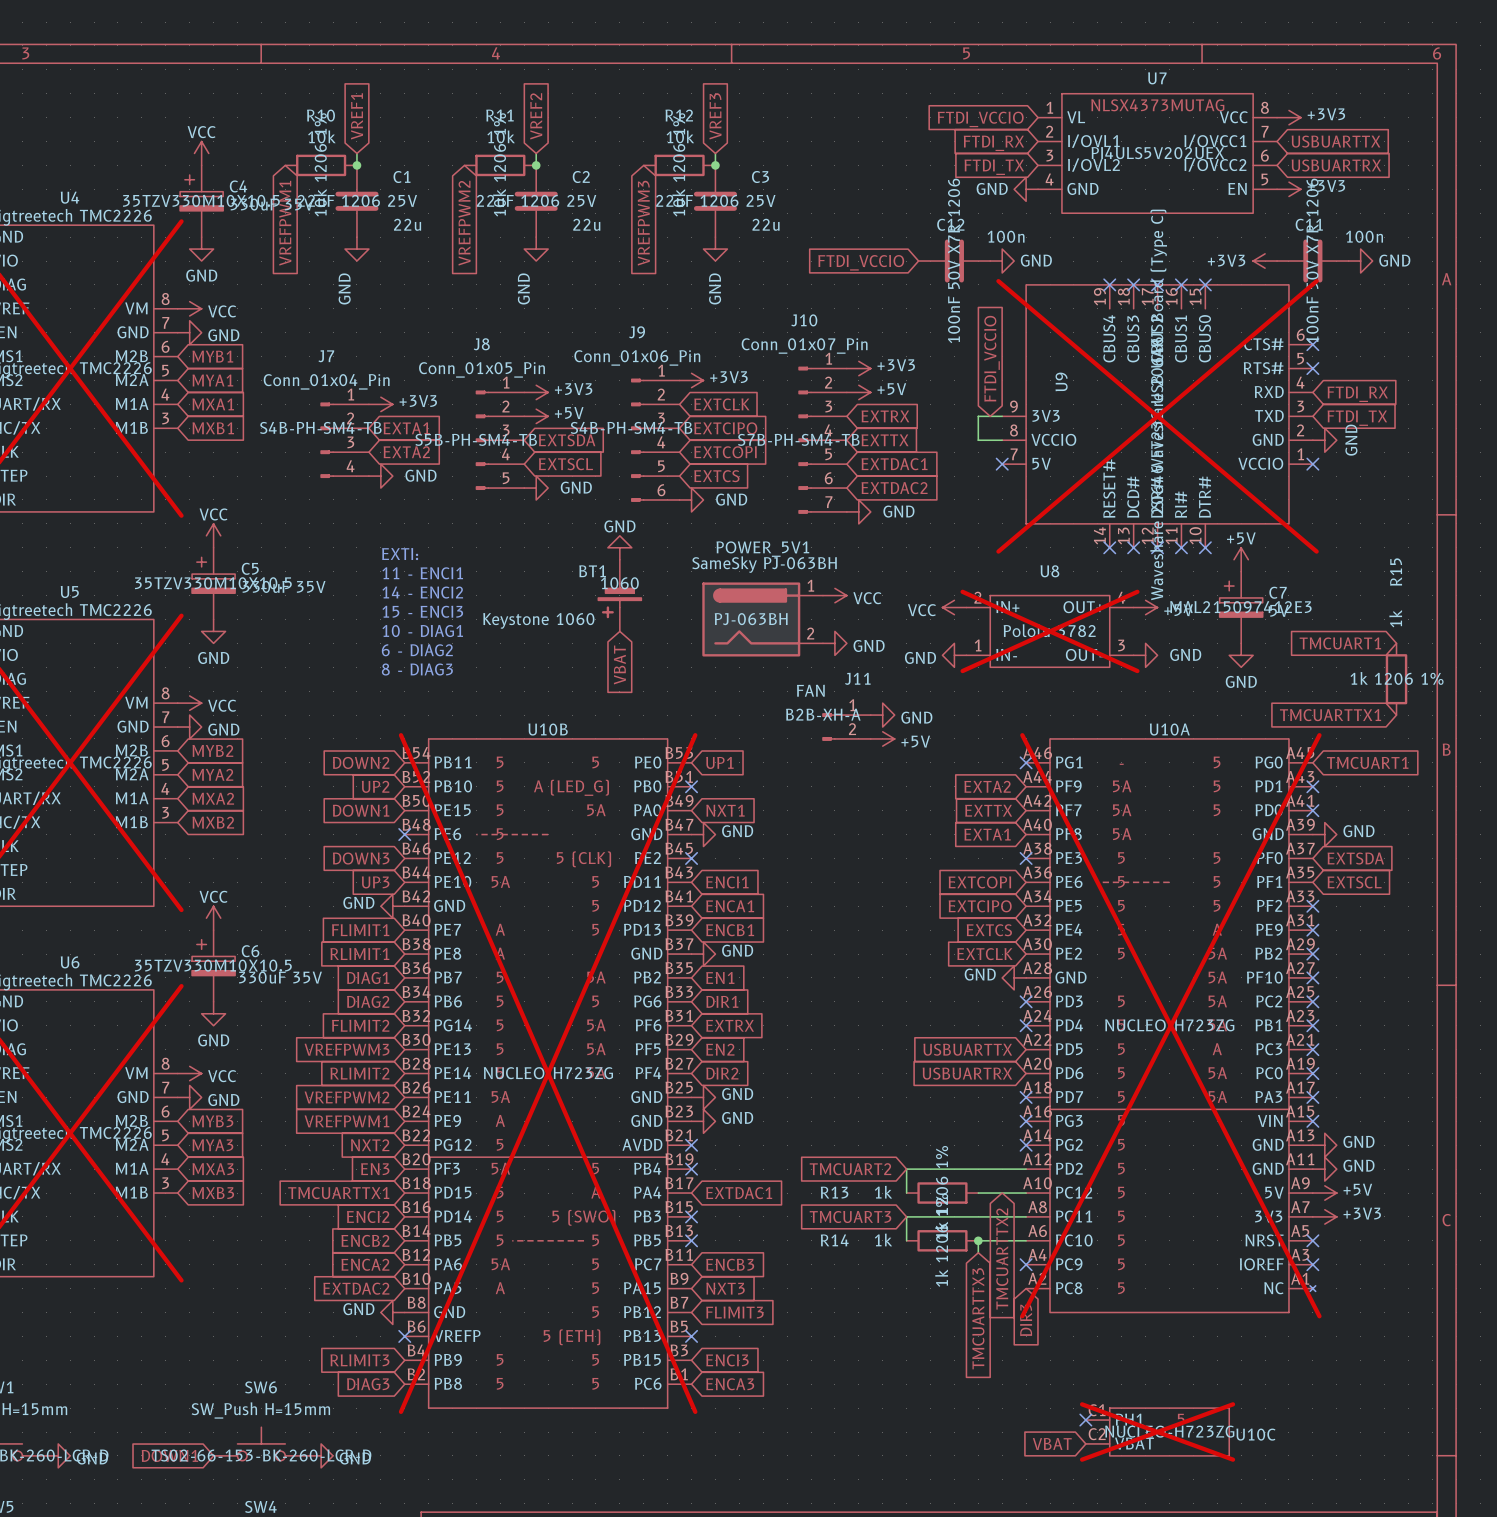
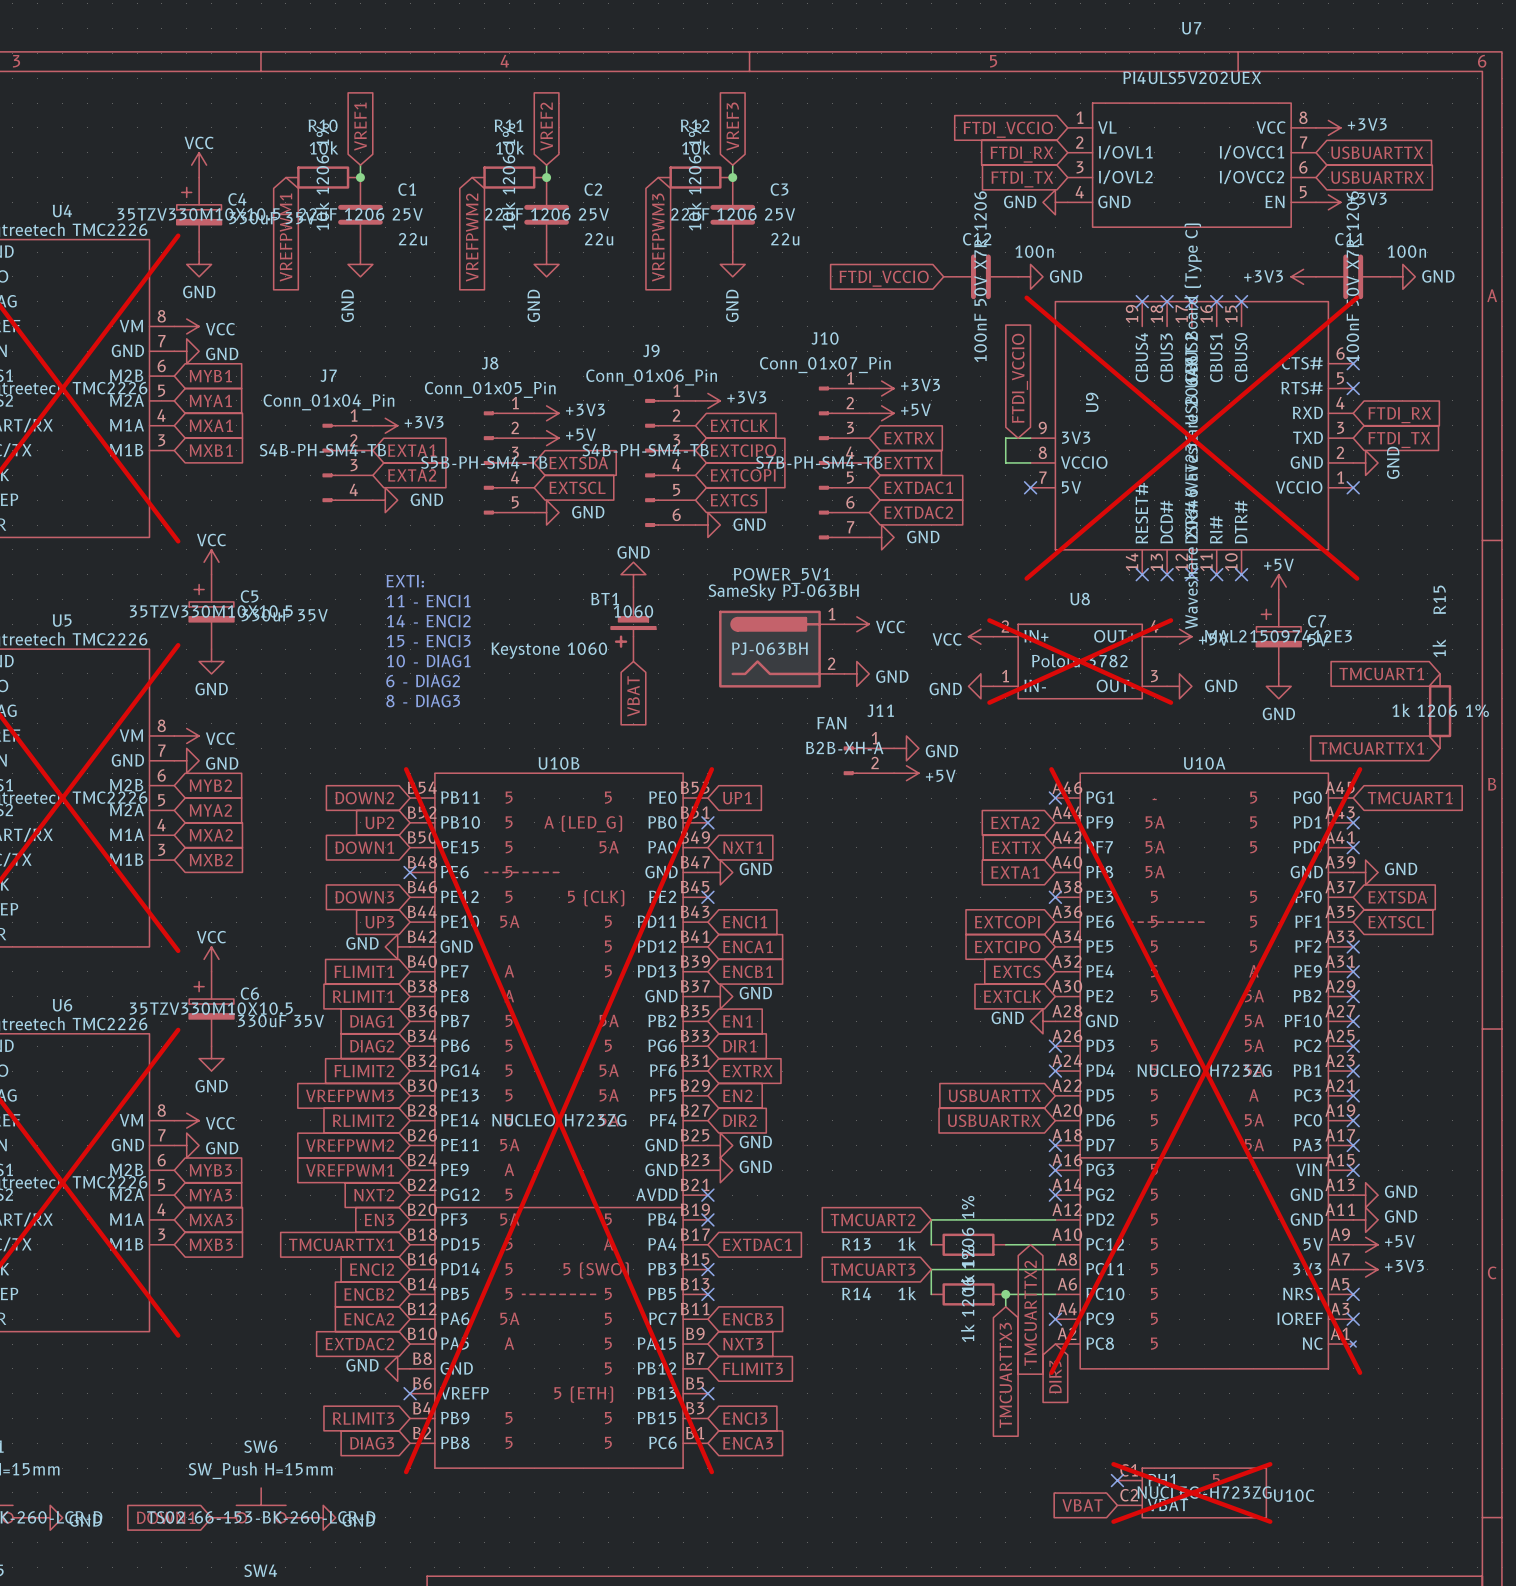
U7 name position: U7 (1157, 78) -> U7 (1191, 28)
U7 text: NLSX4373MUTAG (1157, 105) -> none
U7 text position: PI4ULS5V202UEX (1157, 153) -> PI4ULS5V202UEX (1192, 77)

